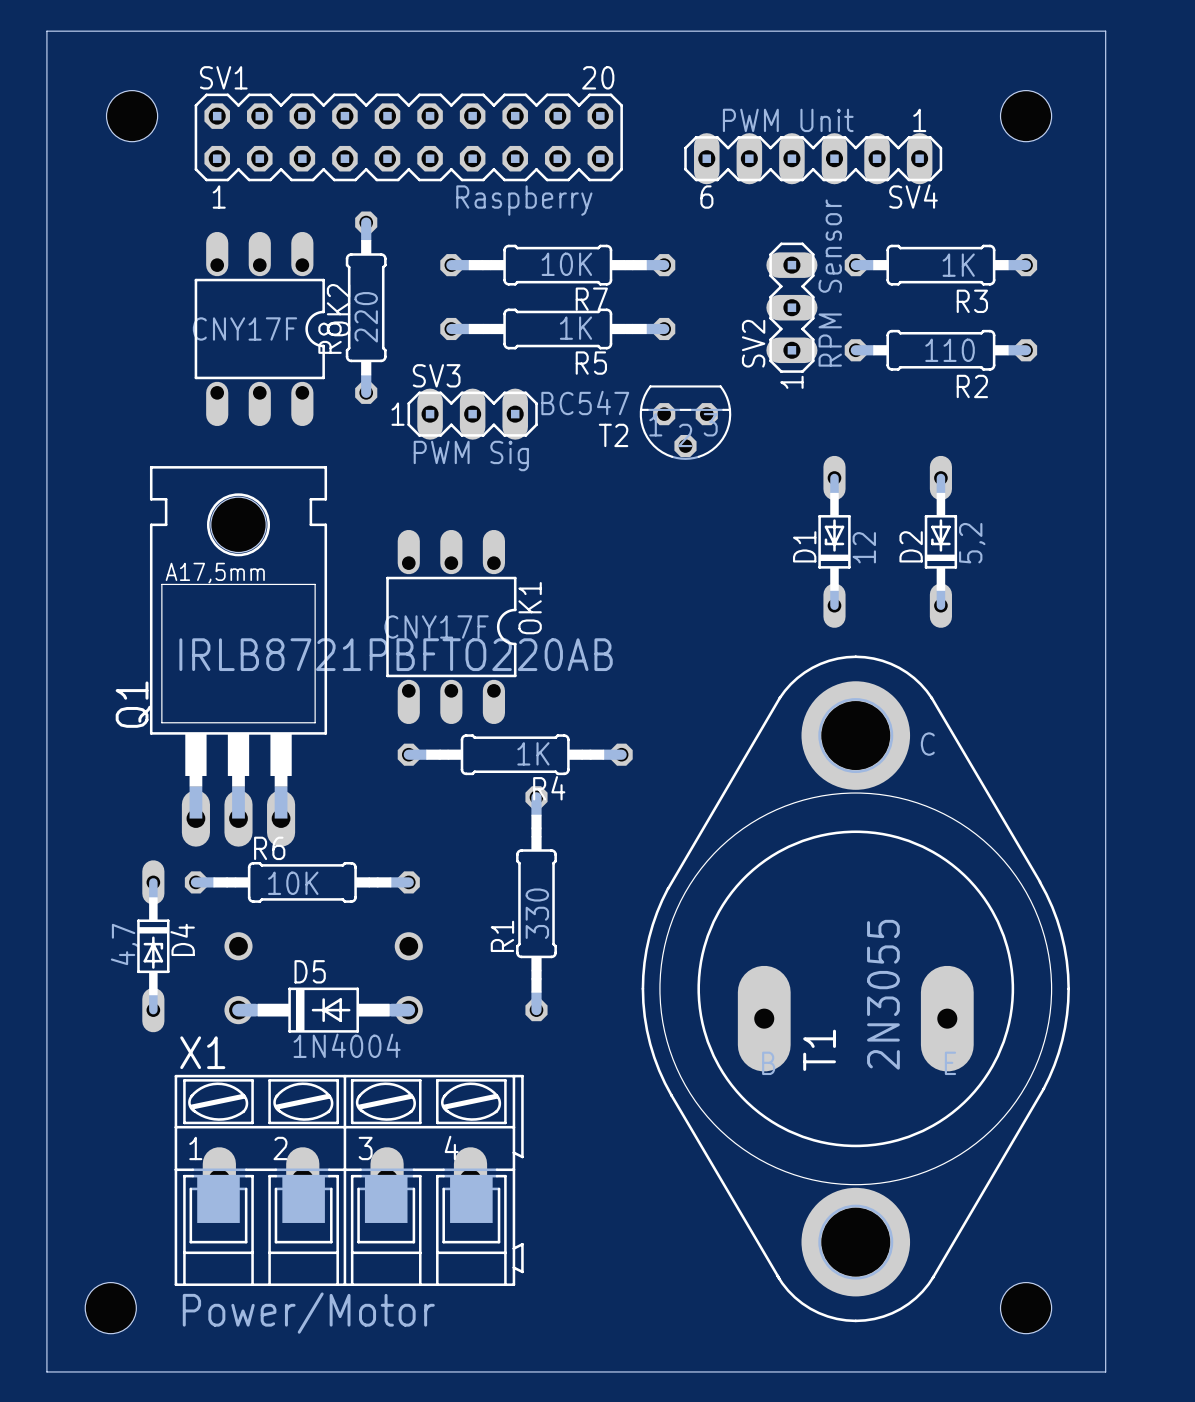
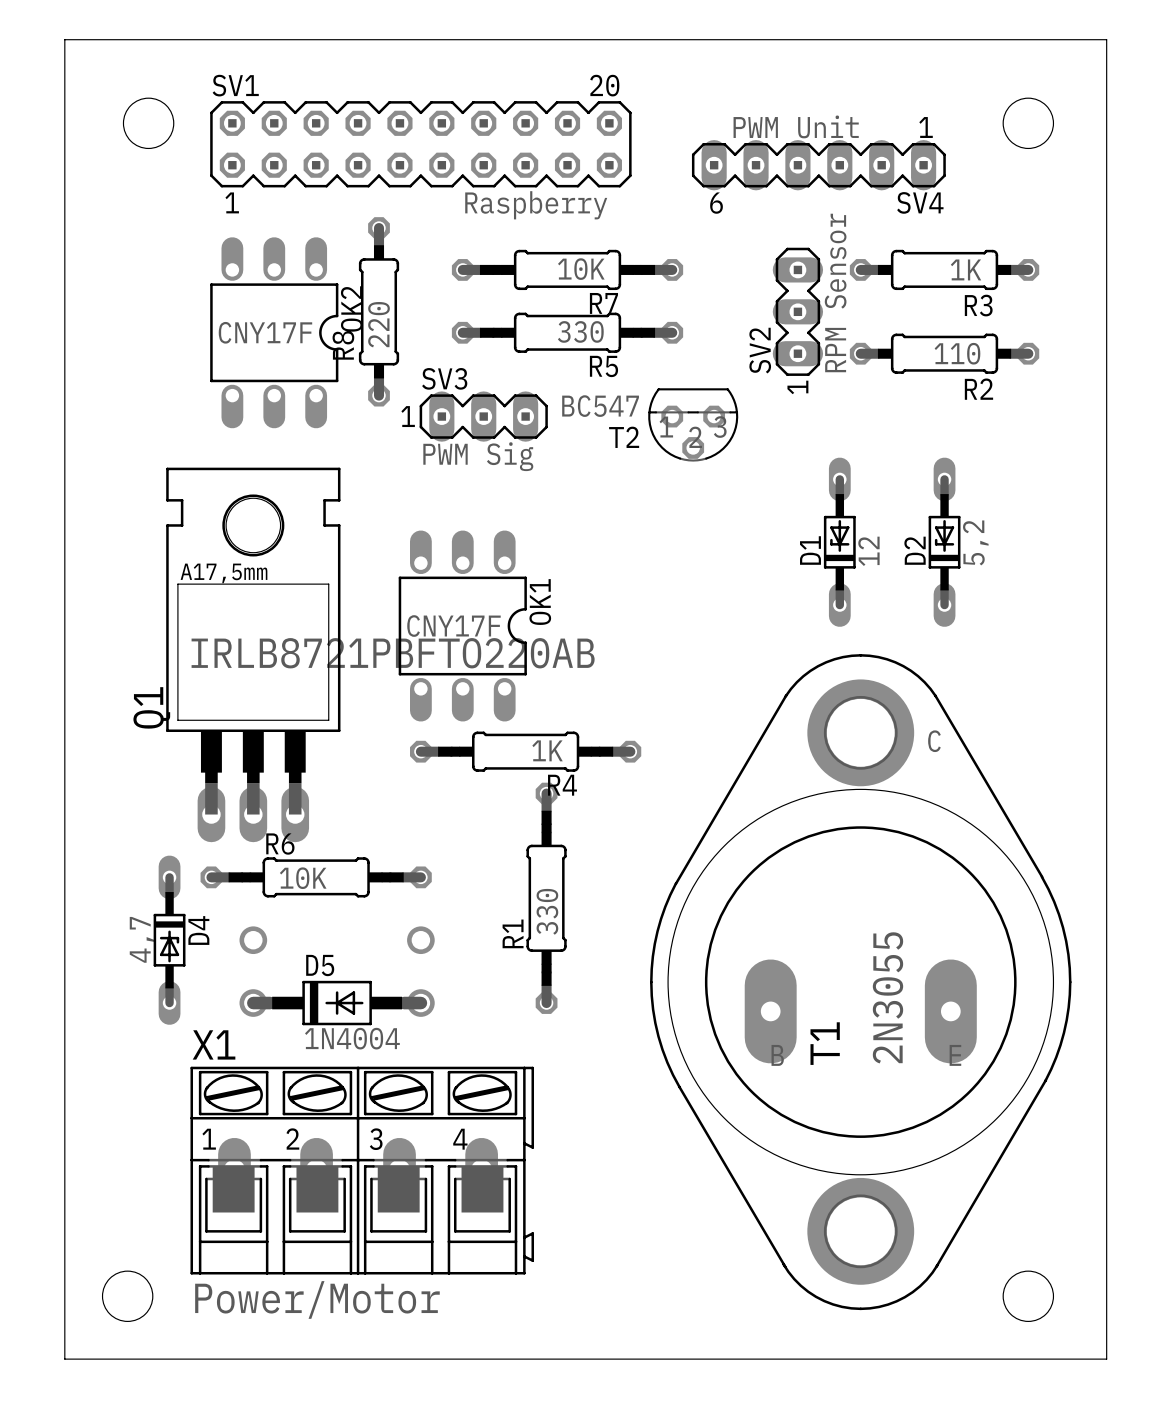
R5 value: 1K (575, 328) -> 330 (580, 331)

